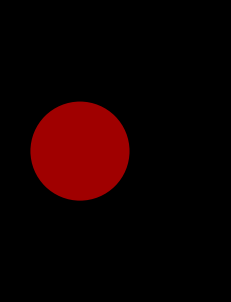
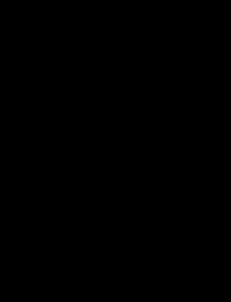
part: (79, 151) -> none

